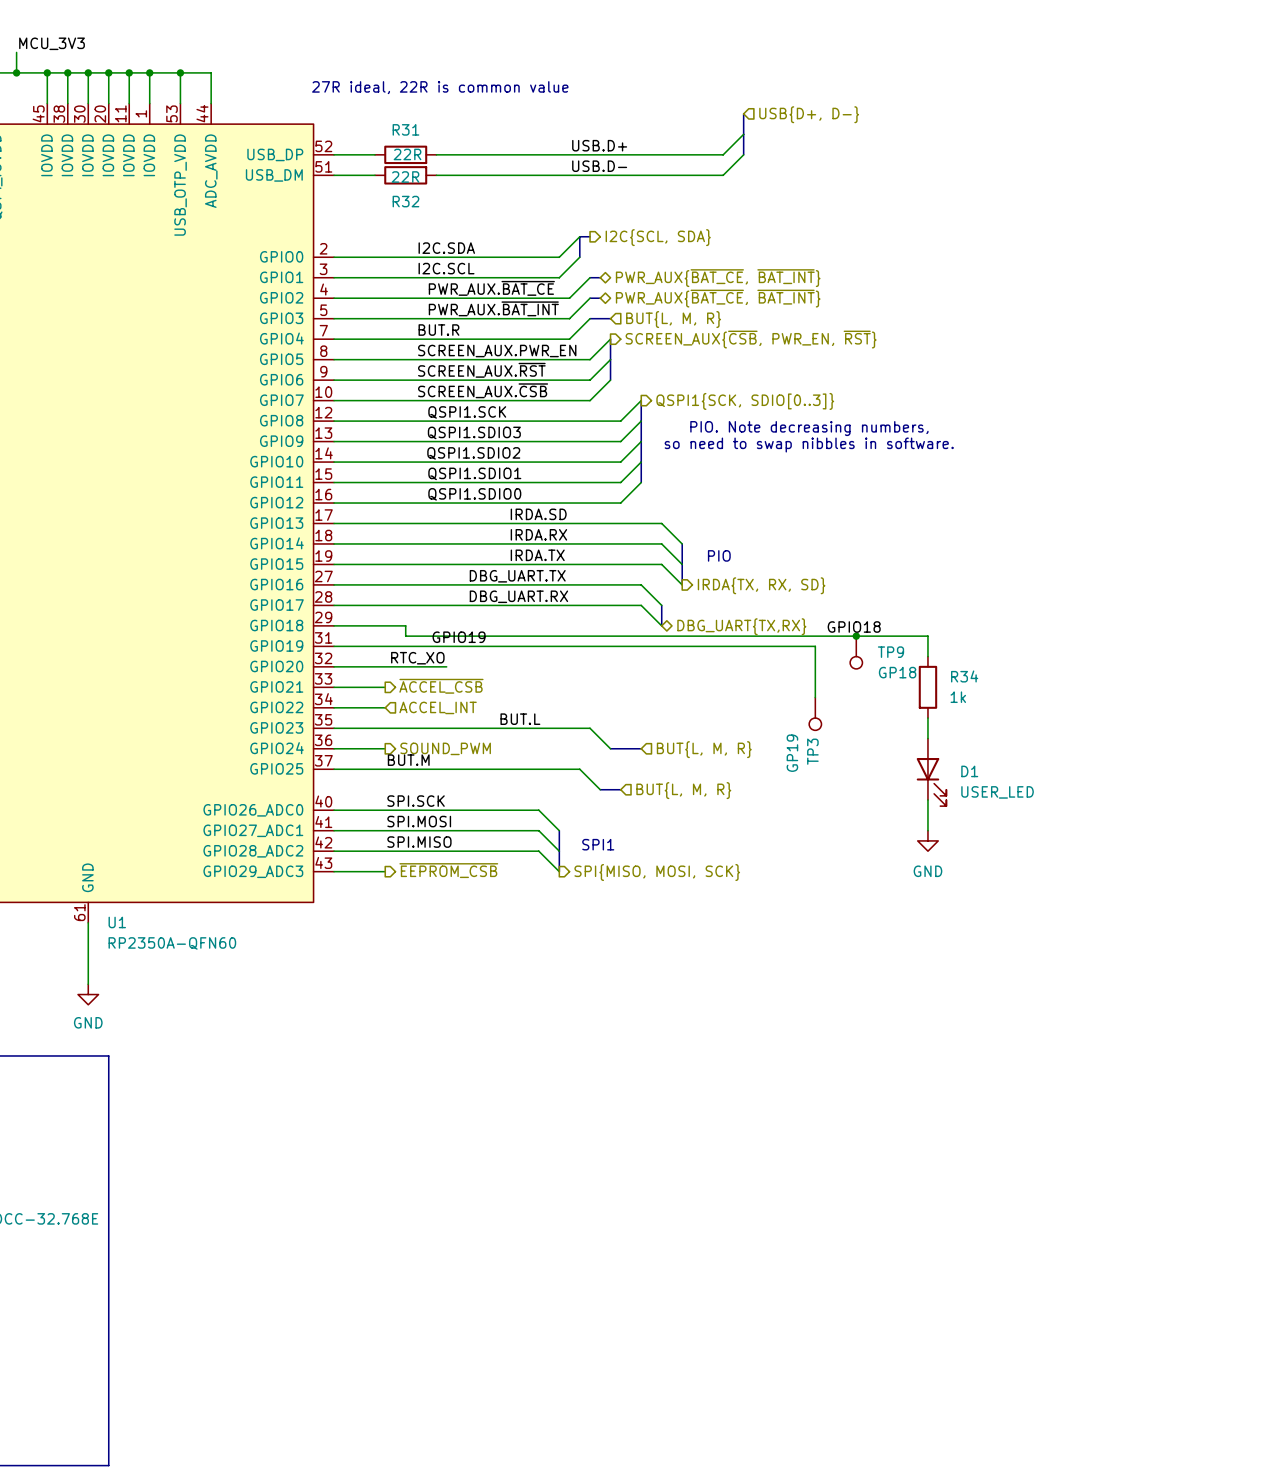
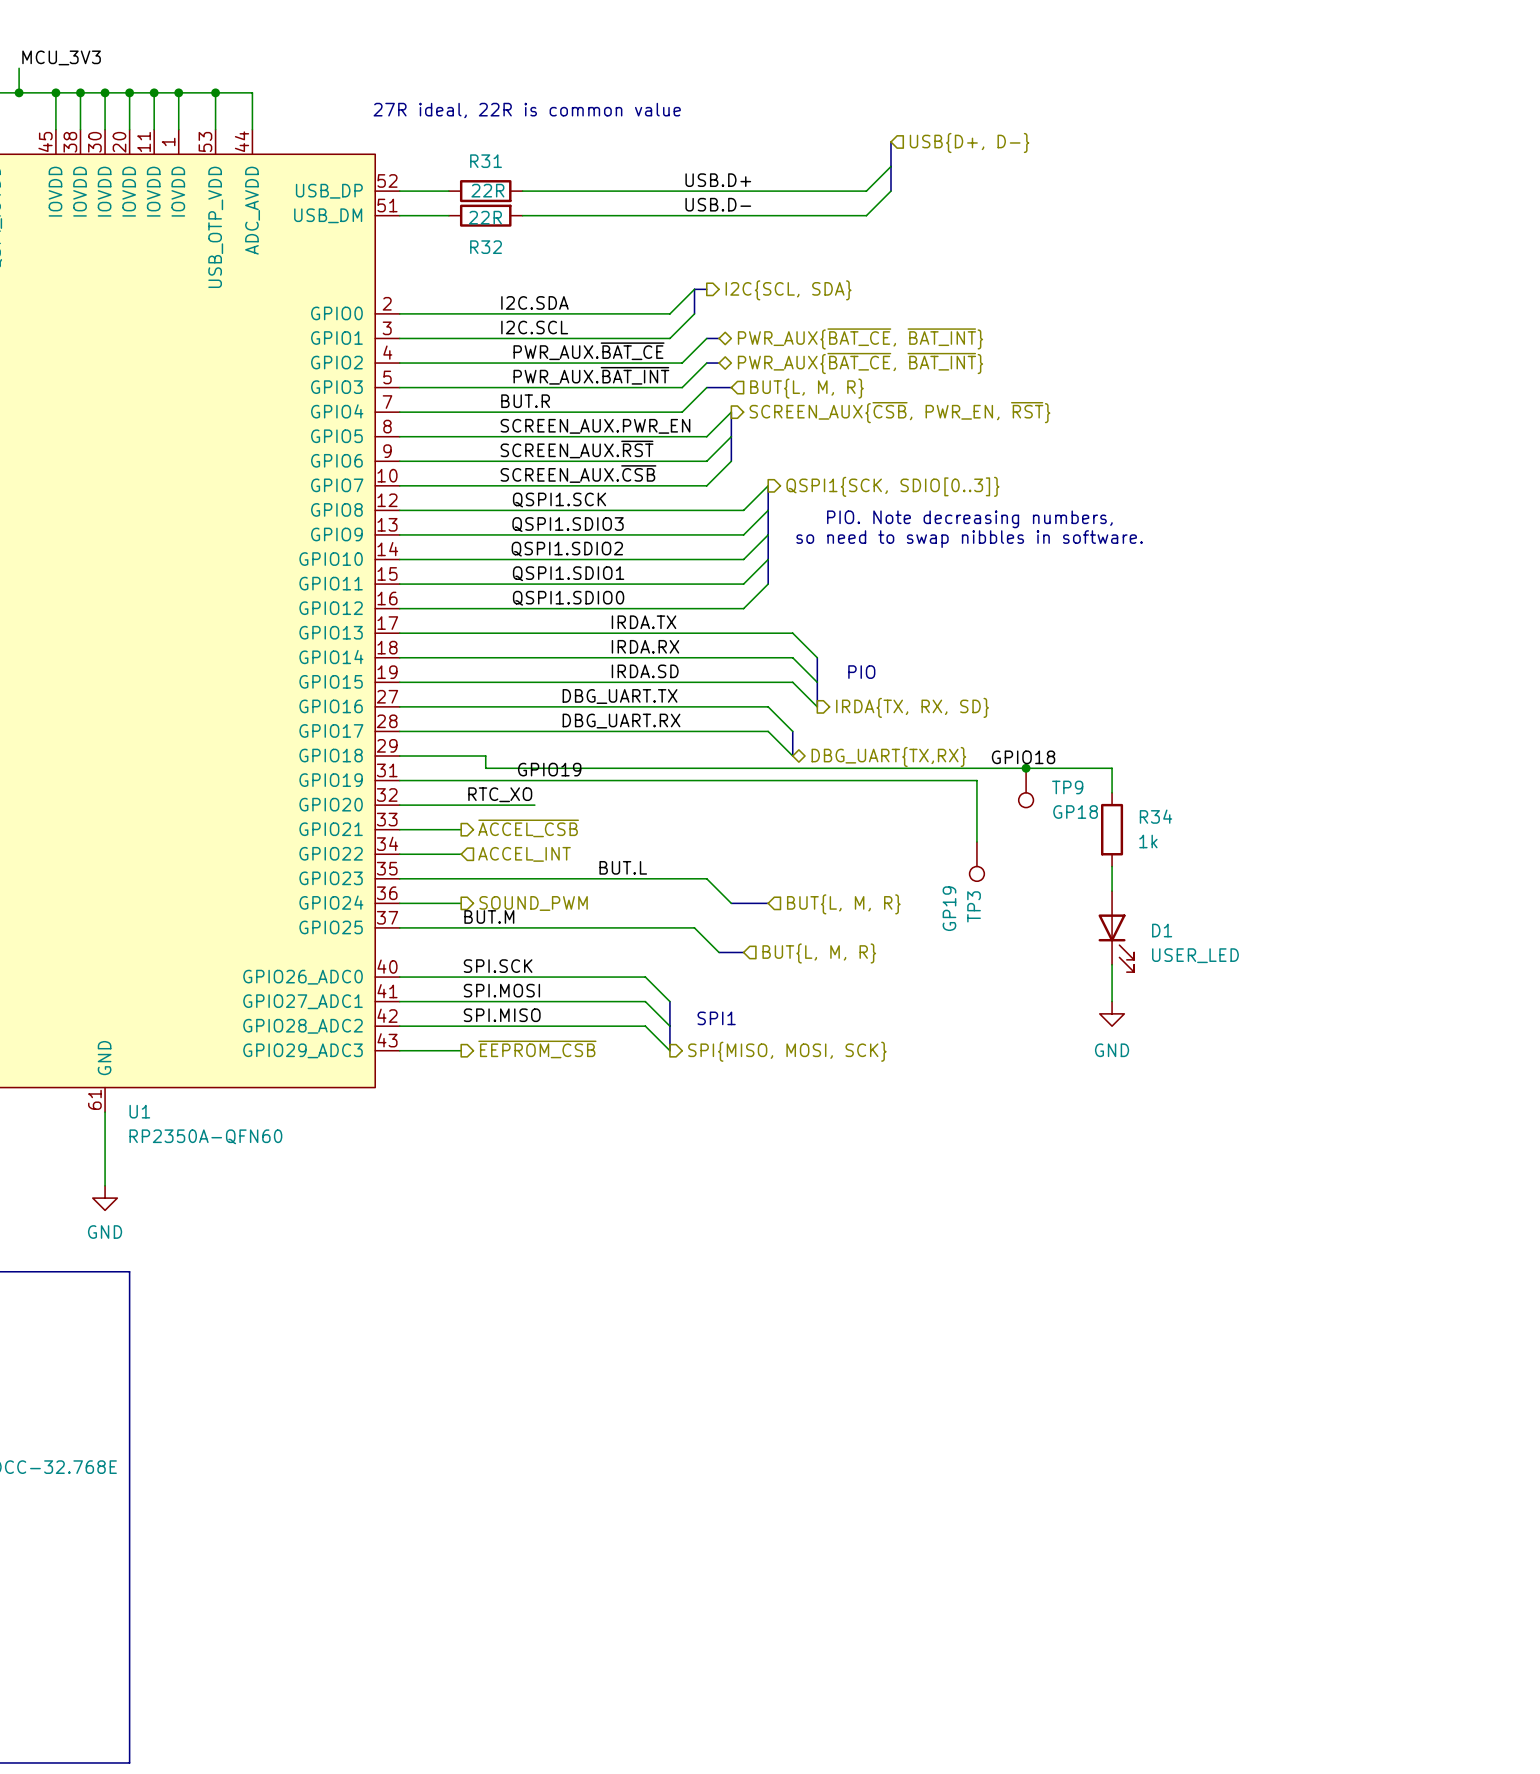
label: IRDA.SD (538, 514) -> IRDA.TX (644, 622)
label: IRDA.TX (537, 555) -> IRDA.SD (645, 671)

